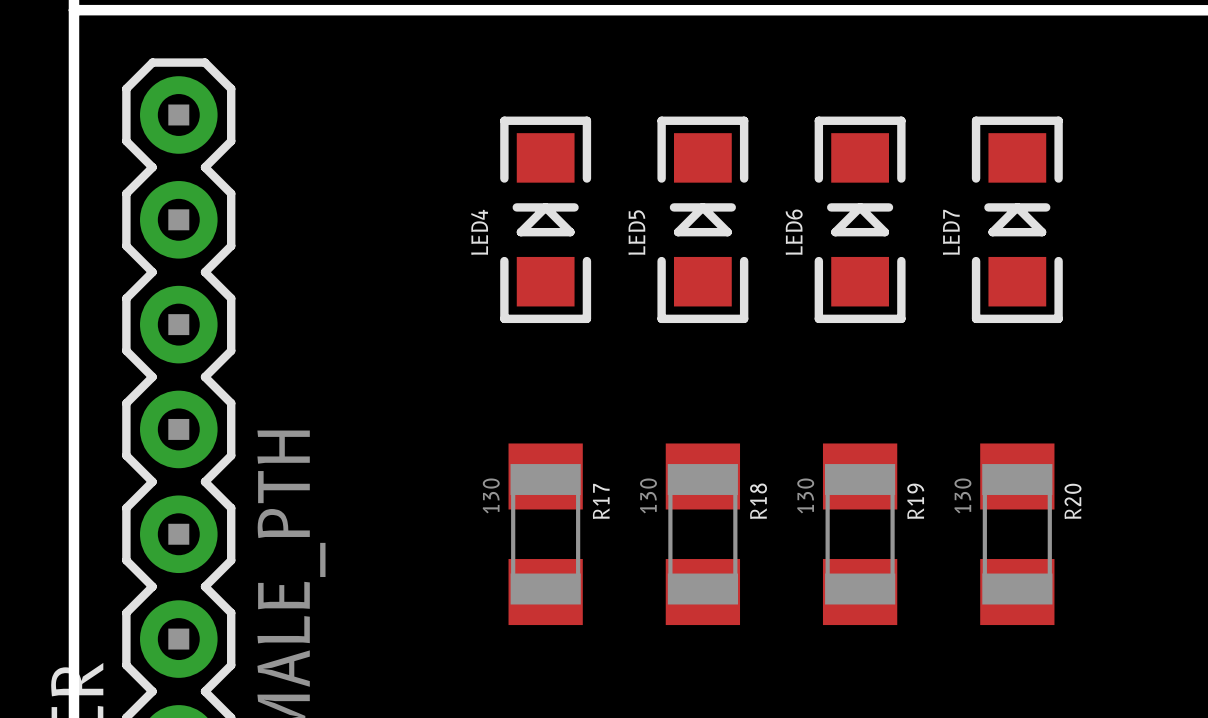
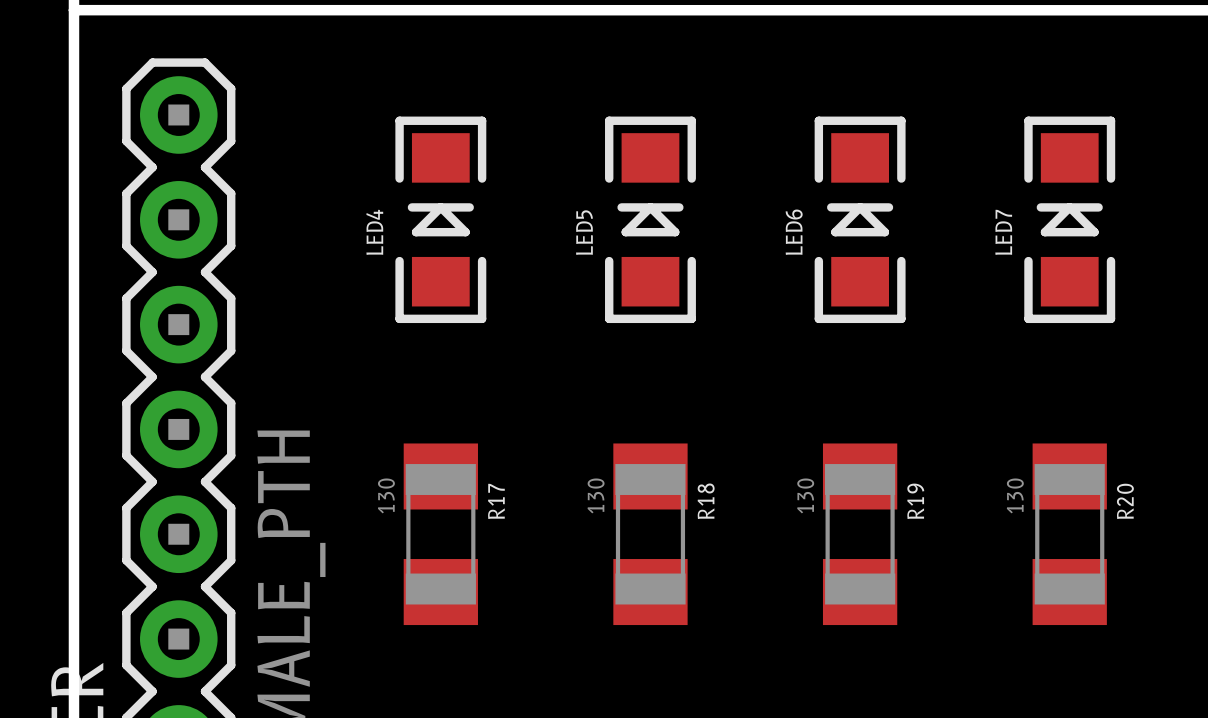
LED4 position: (545, 219) -> (440, 219)
LED5 position: (702, 219) -> (650, 219)
LED7 position: (1017, 219) -> (1069, 219)
R17 position: (545, 534) -> (440, 534)
R18 position: (702, 534) -> (650, 534)
R20 position: (1017, 534) -> (1069, 534)

